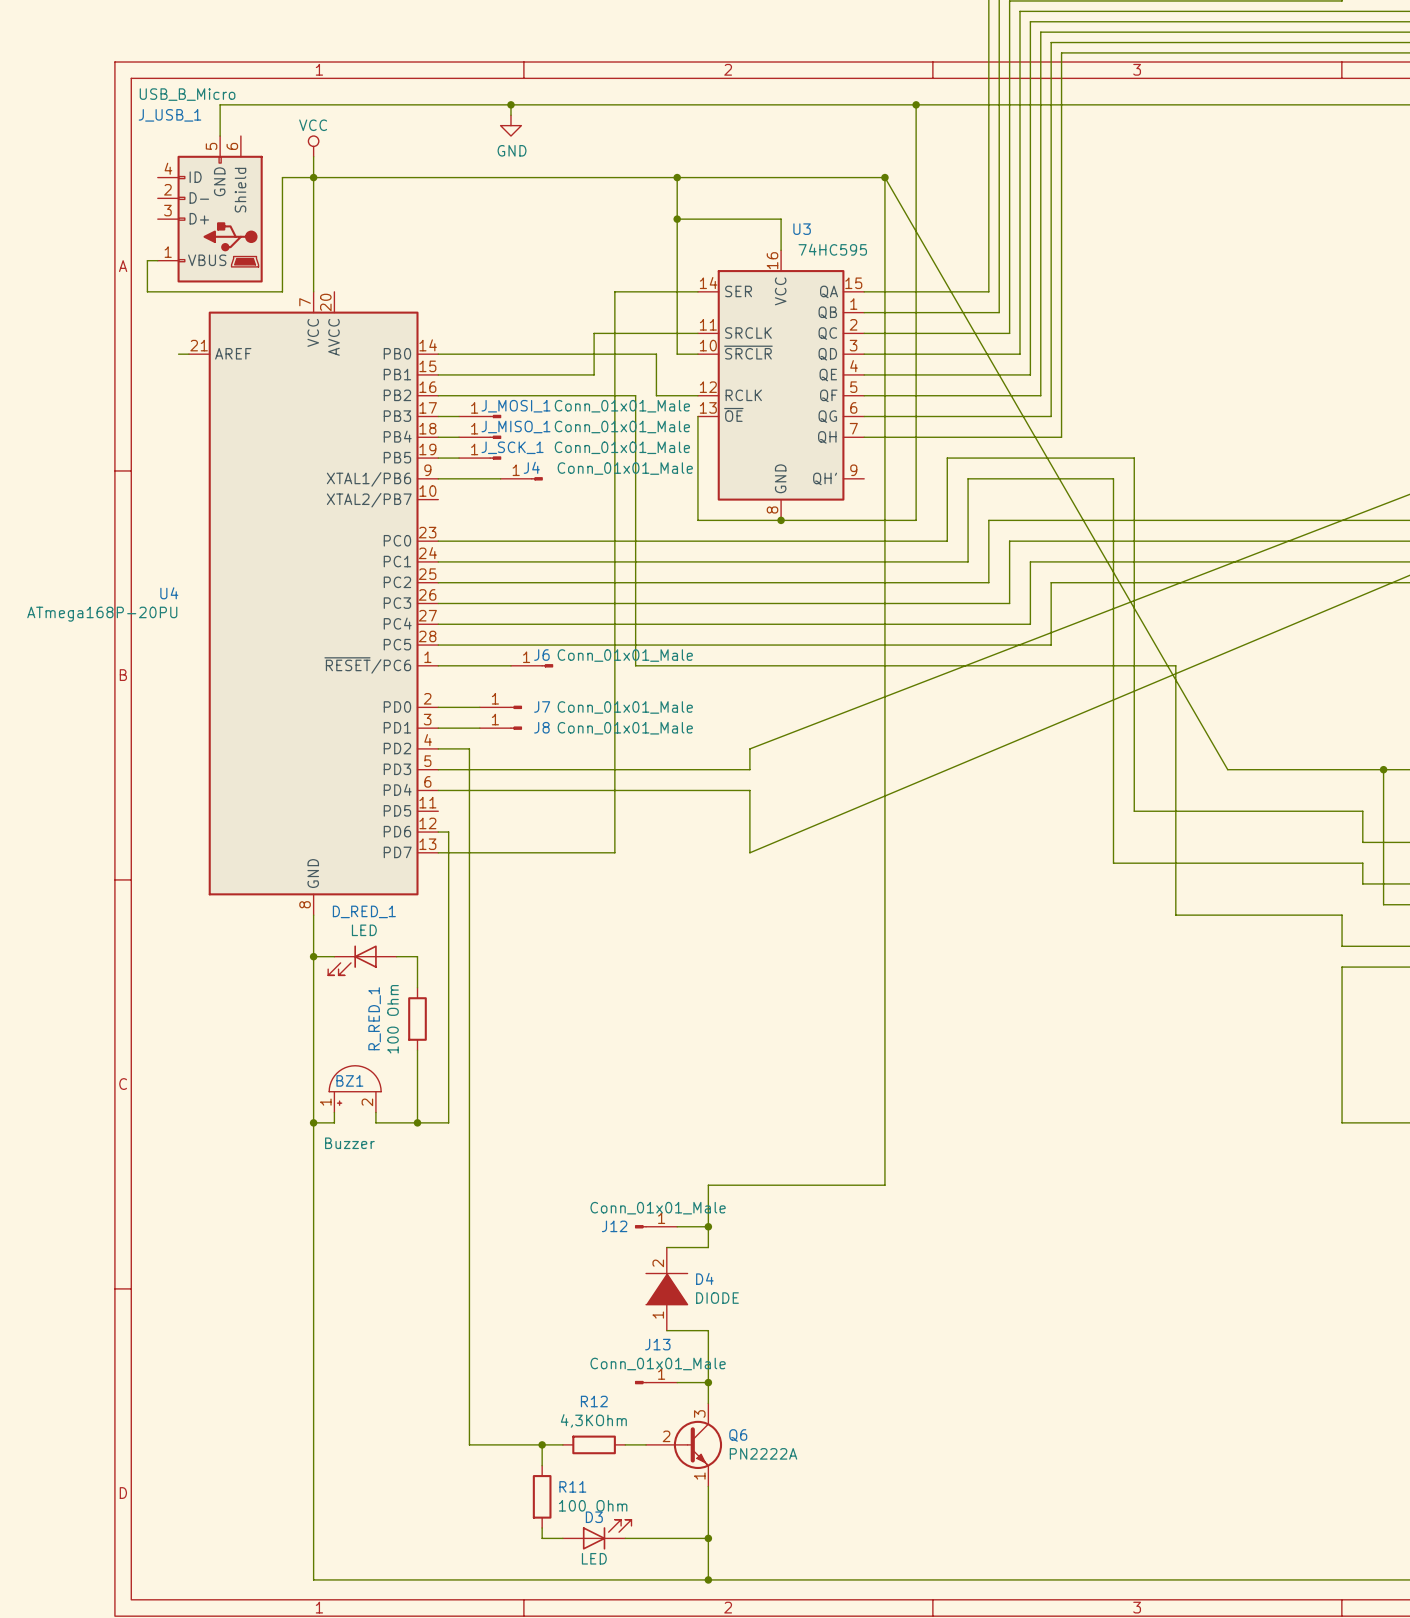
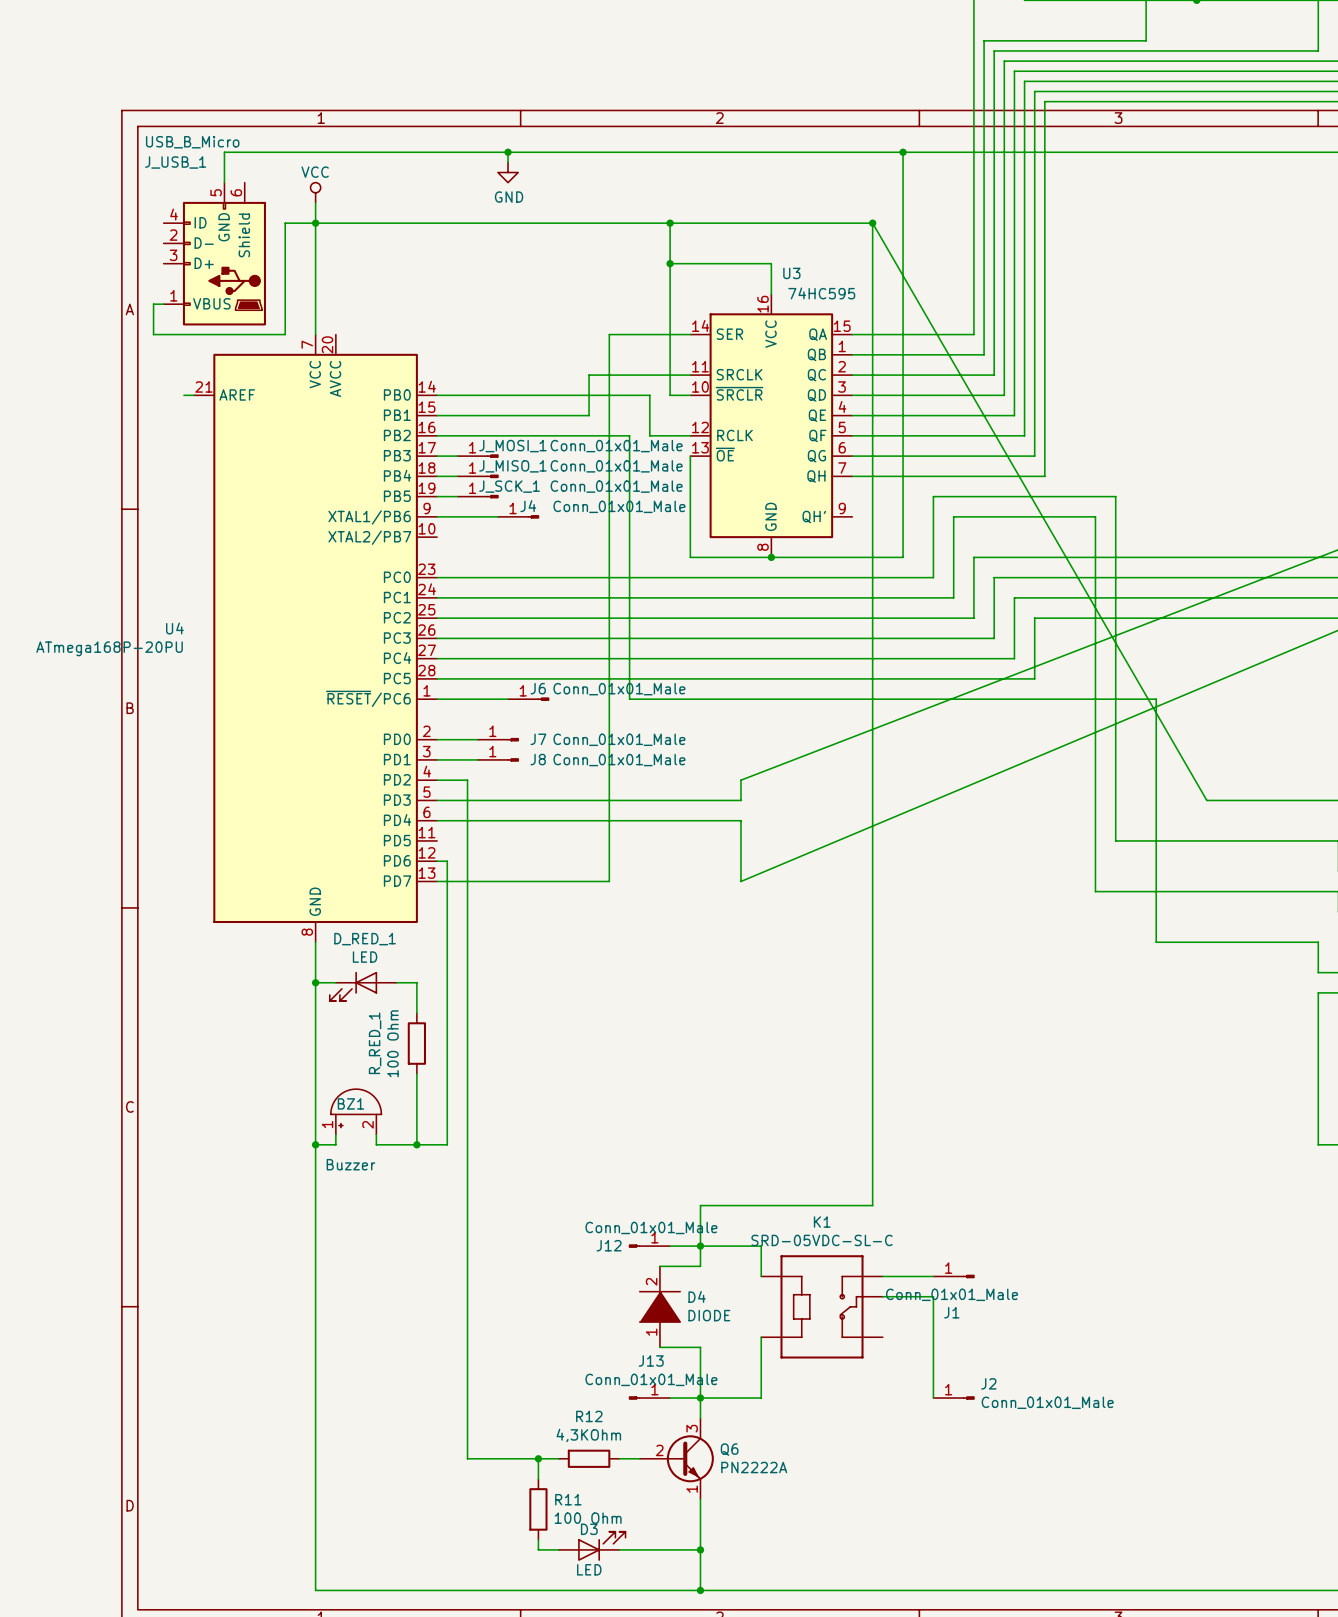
wire: none -> (700, 1246) (761, 1246) (761, 1276)
wire: none -> (882, 1276) (933, 1276)
J1: none -> Conn_01x01_Male (953, 1276)
wire: none -> (882, 1296) (933, 1296) (933, 1398)
K1: none -> SRD-05VDC-SL-C (822, 1306)
wire: none -> (761, 1337) (761, 1398) (700, 1398)
J2: none -> Conn_01x01_Male (953, 1398)

